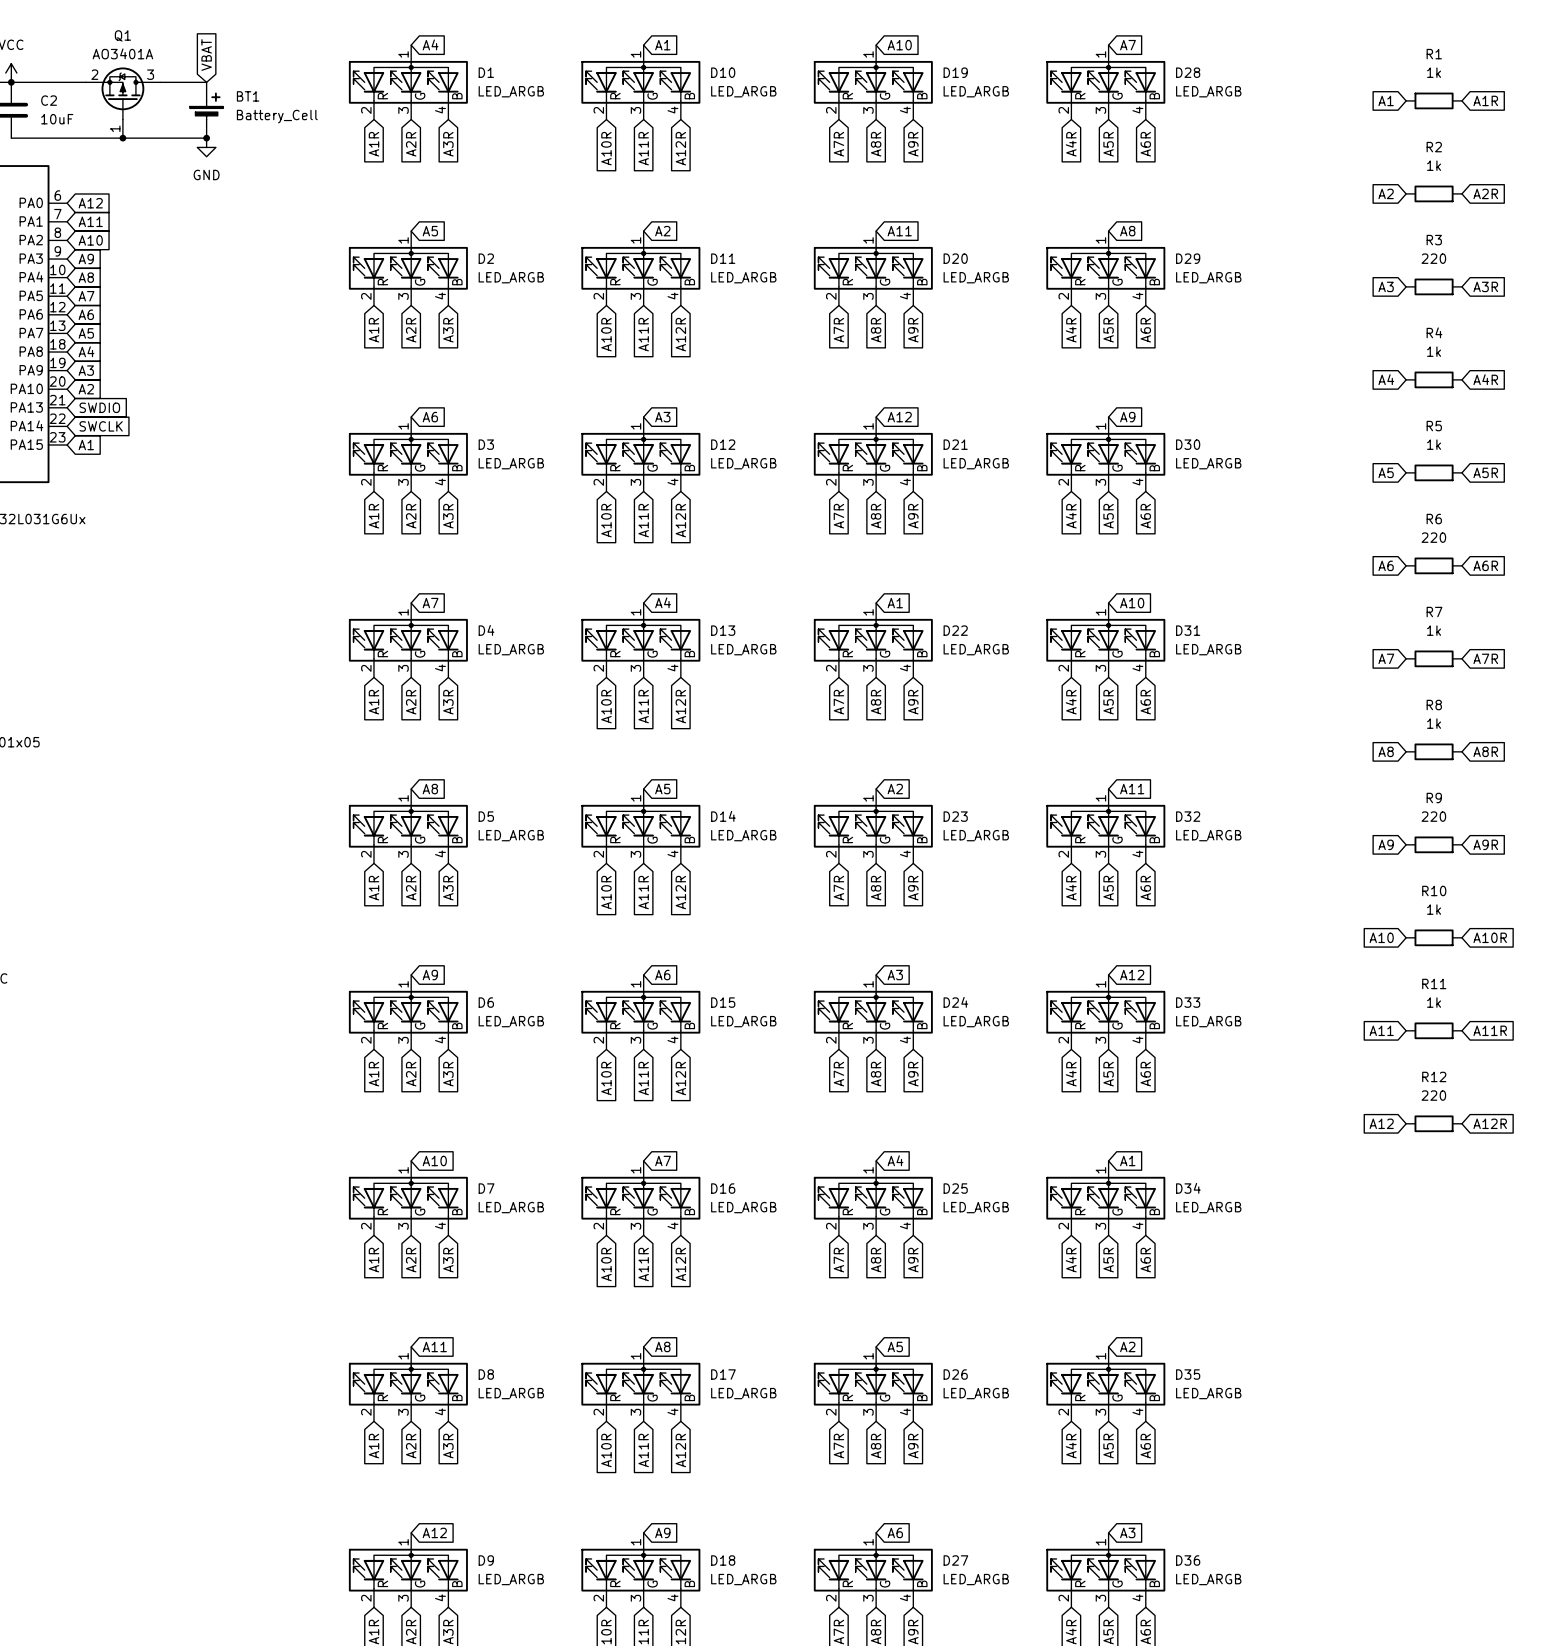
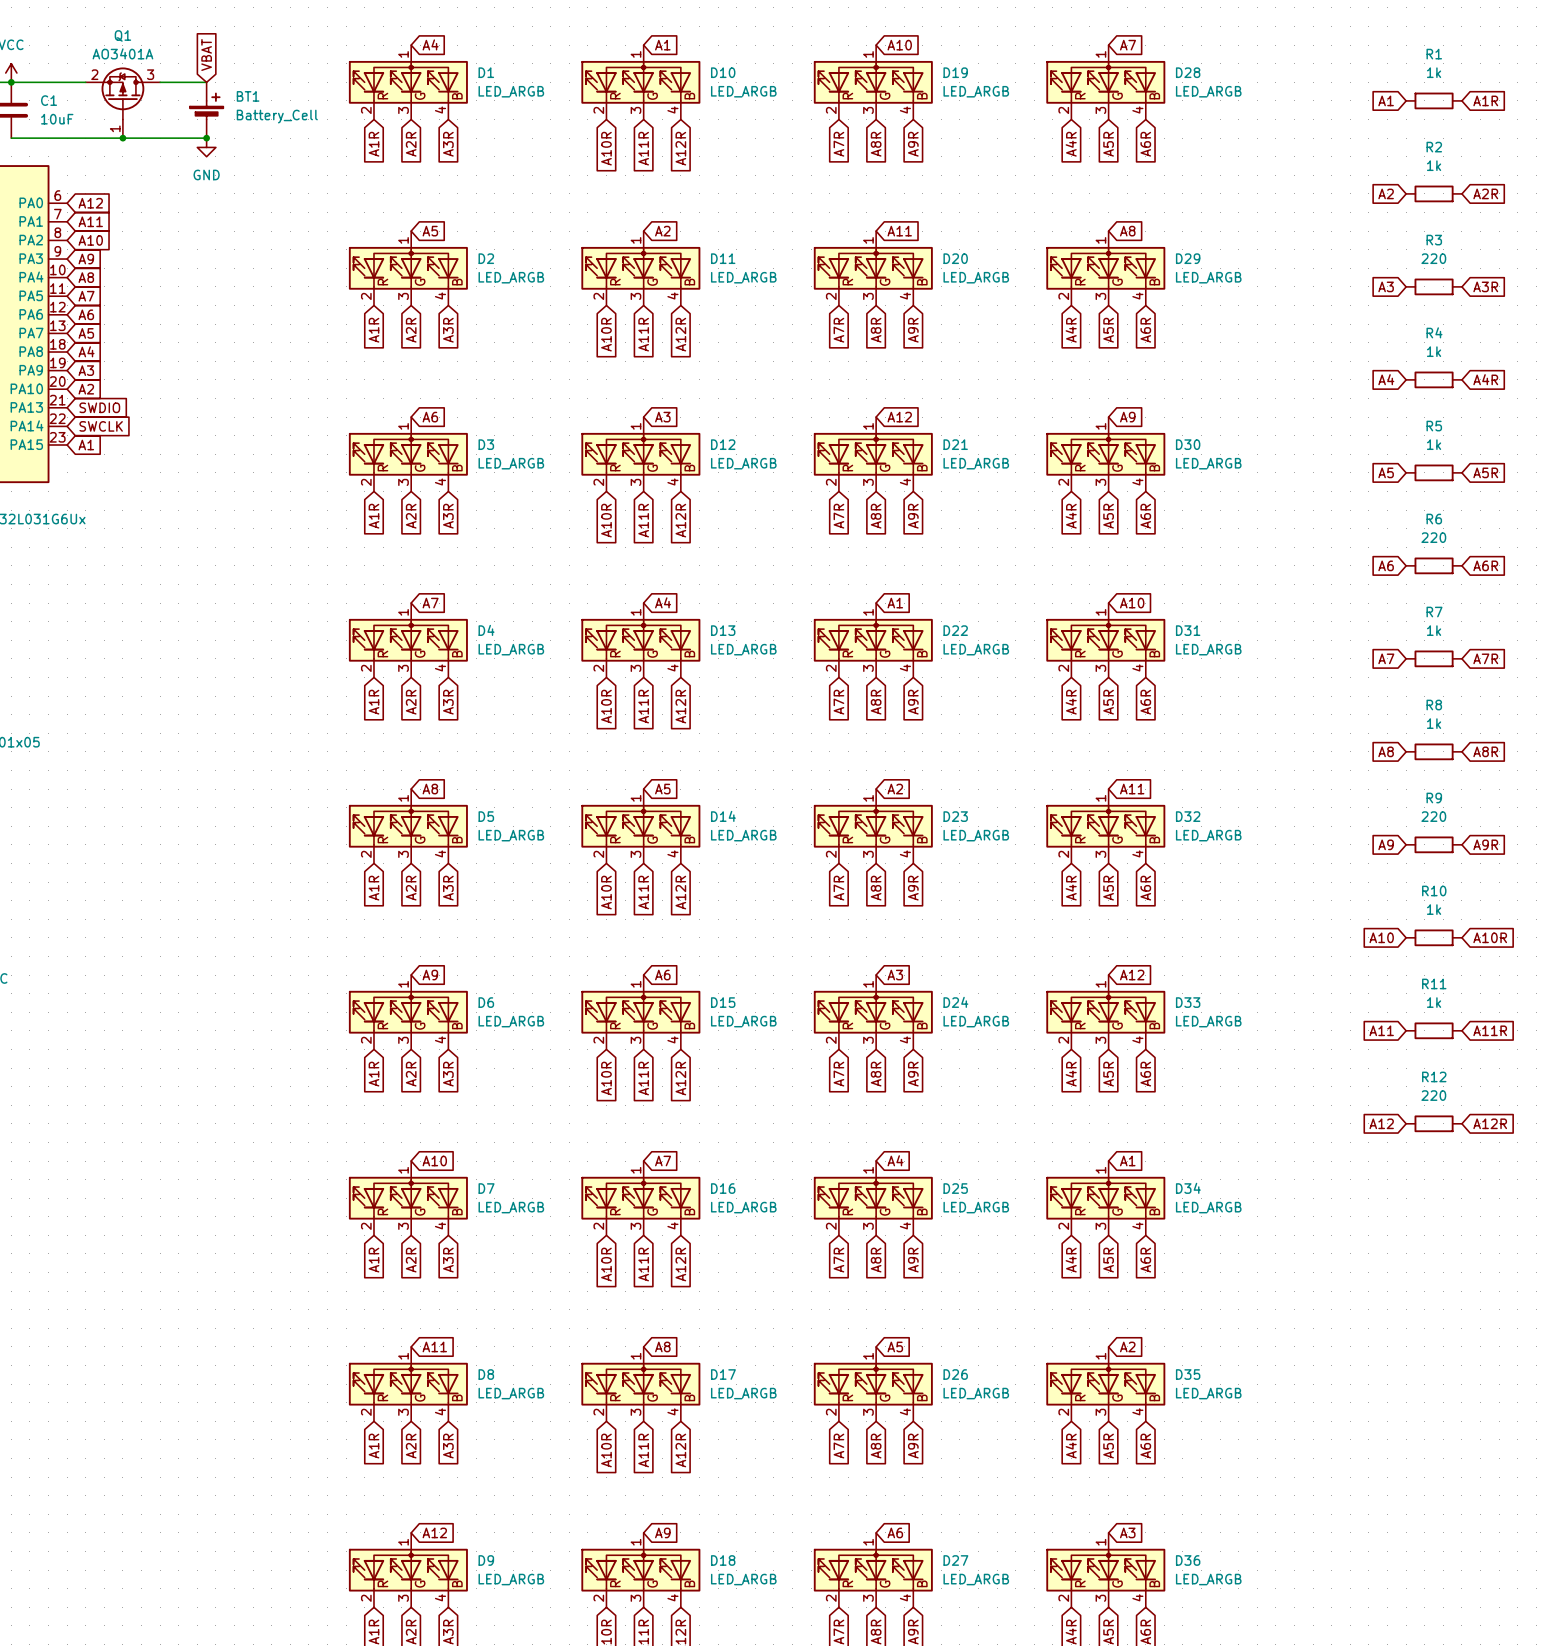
C2 name: C2 (49, 100) -> C1 (49, 100)

